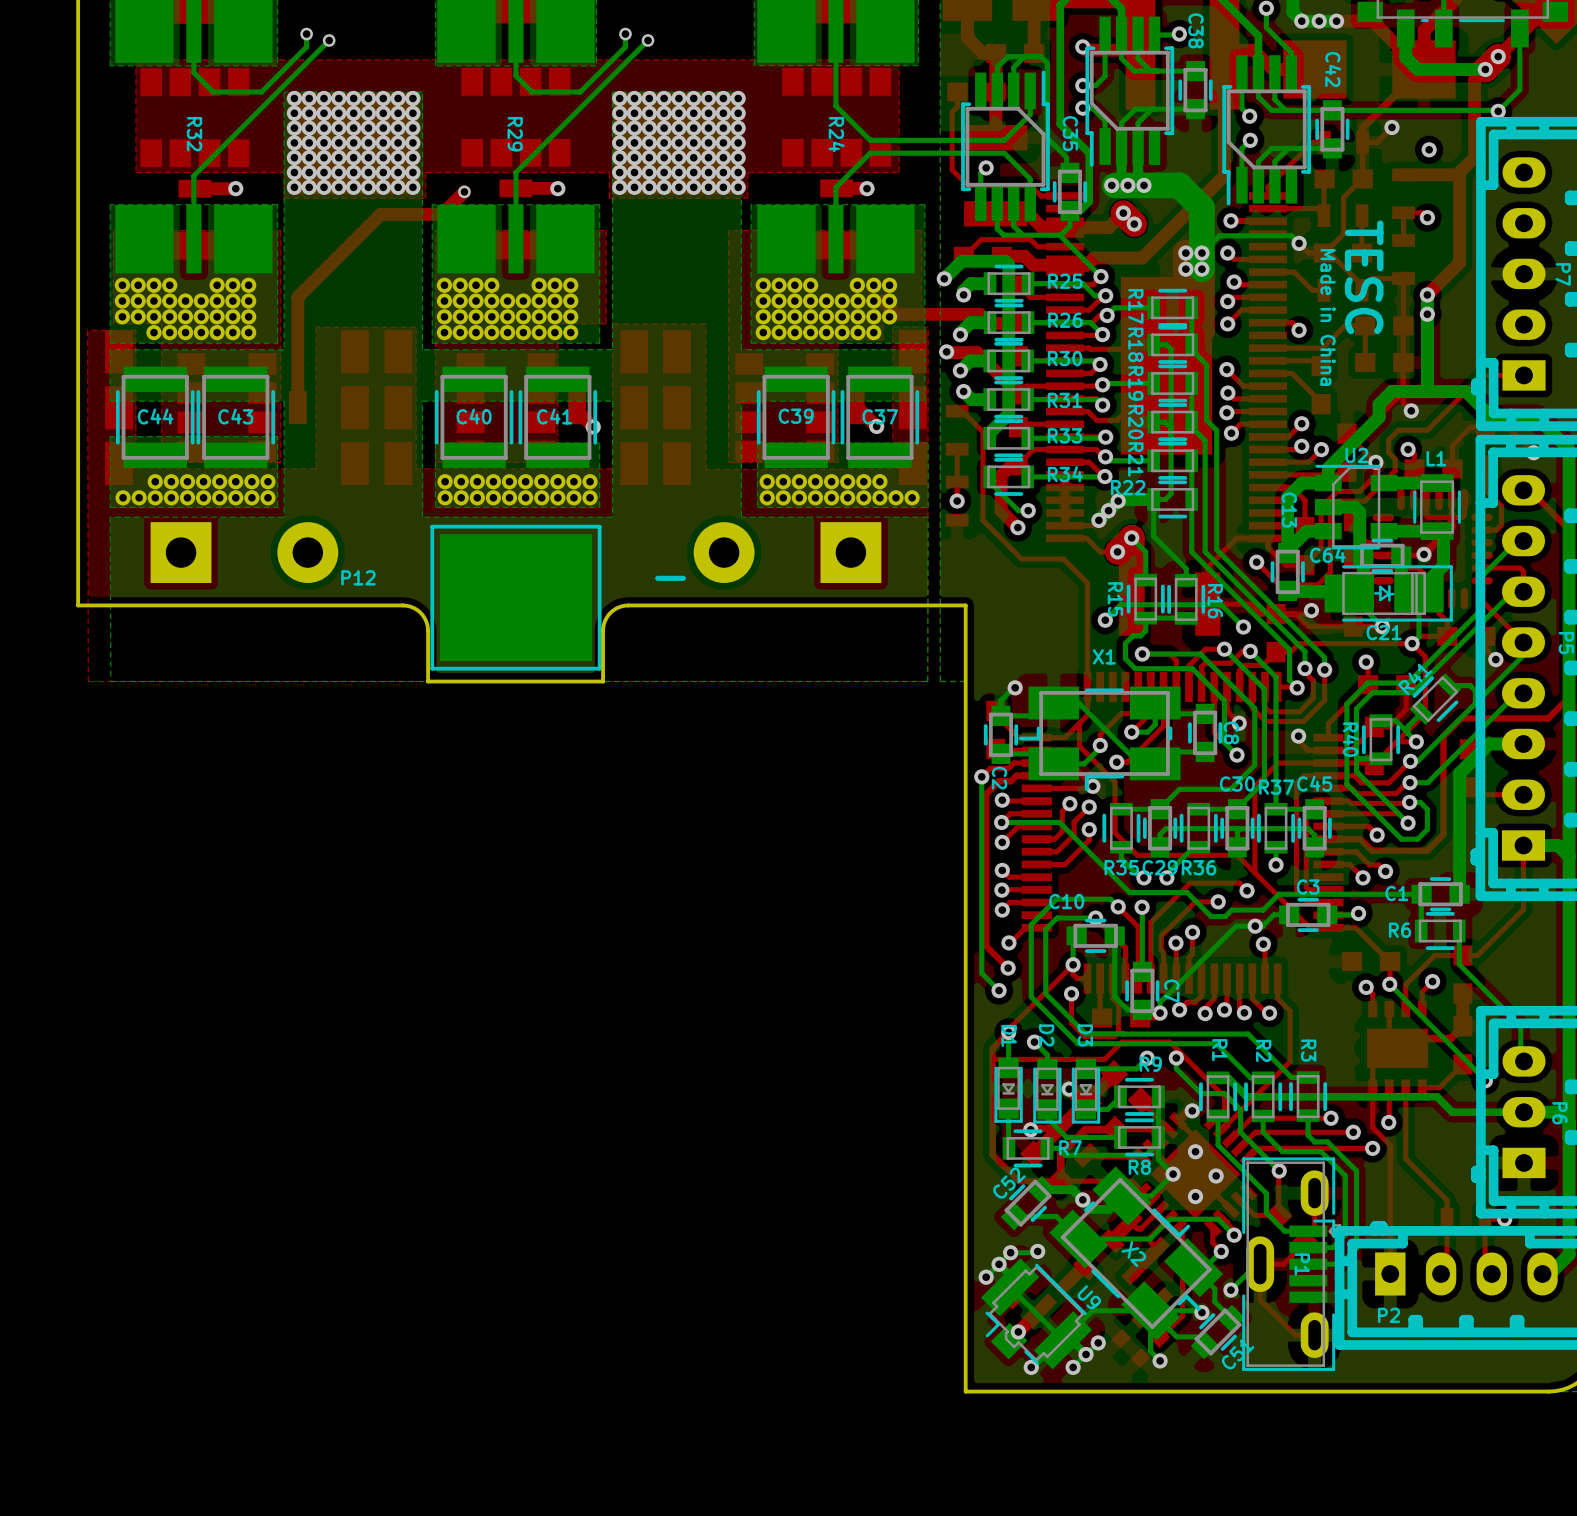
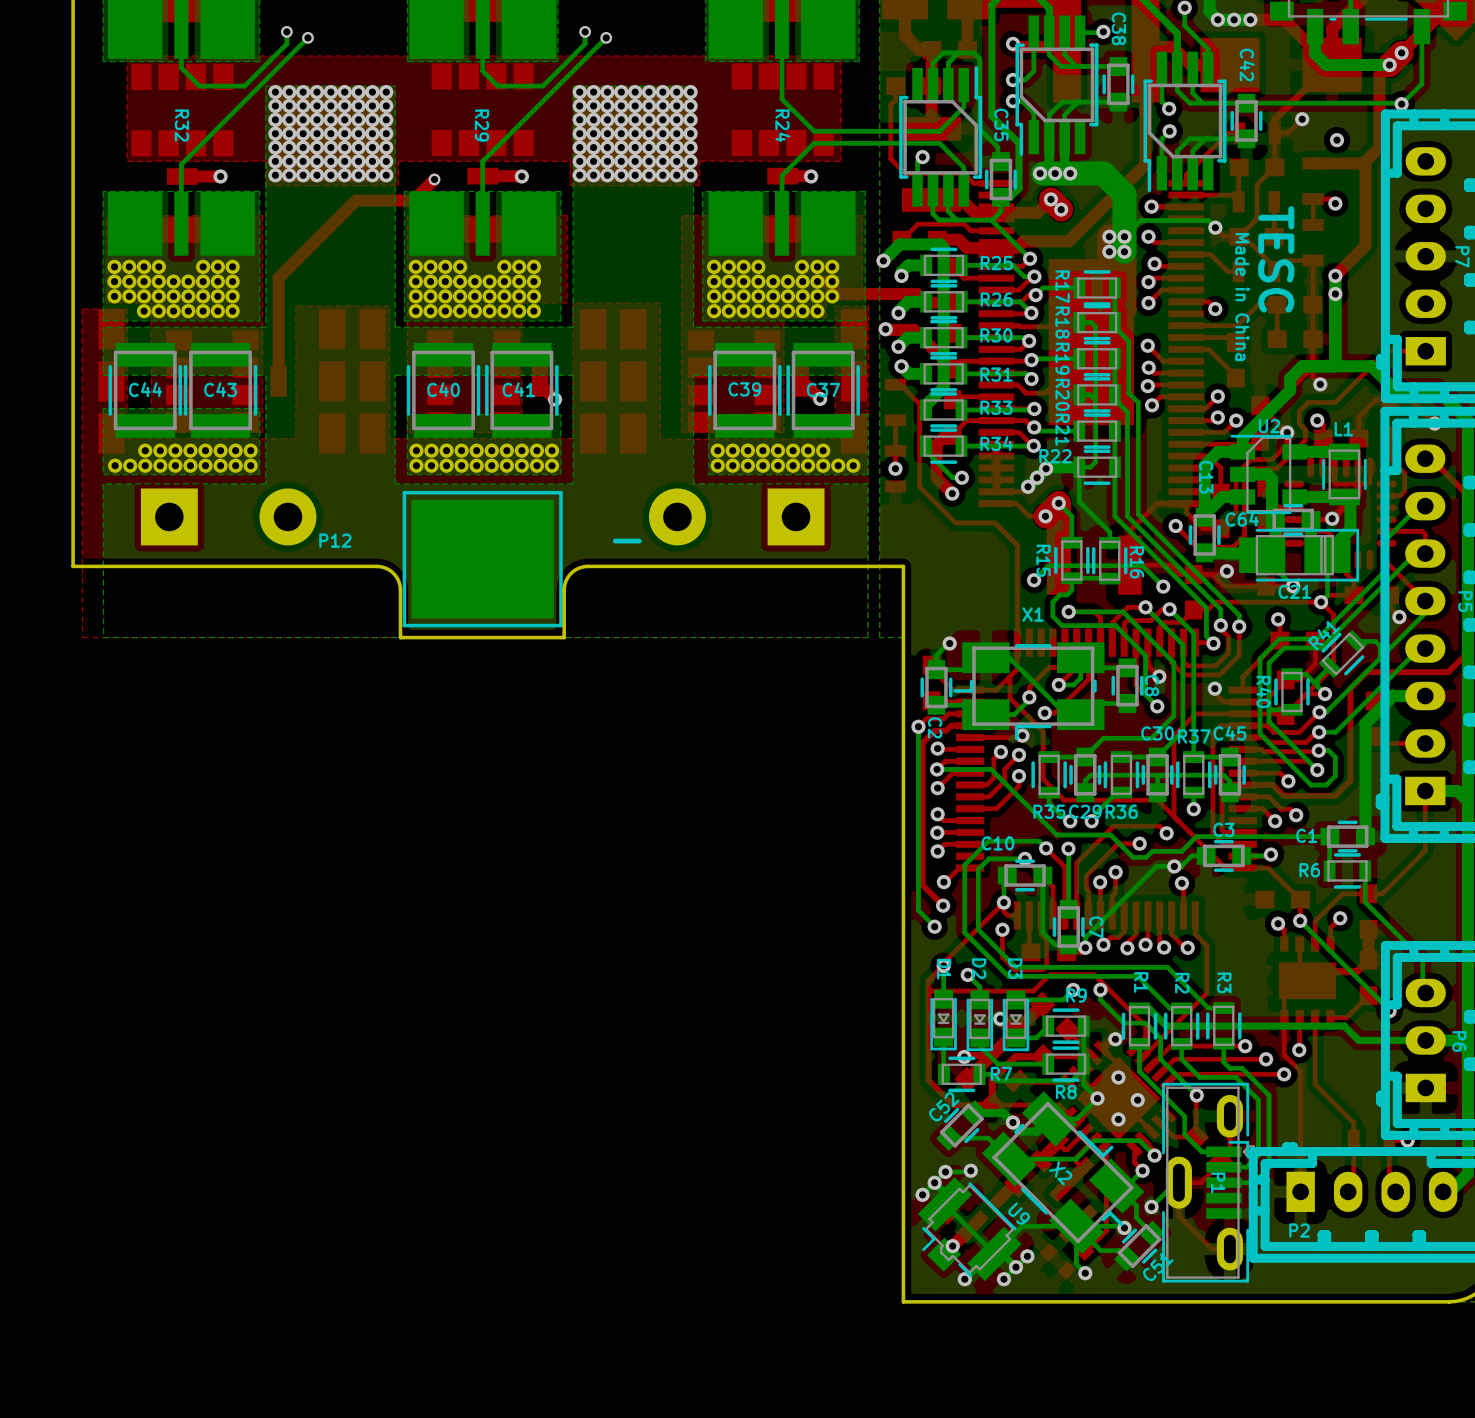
line: (1389, 586) (1389, 600) -> none
line: (1380, 593) (1375, 593) -> none
line: (1393, 594) (1388, 594) (1380, 586) (1380, 599) (1388, 594) -> none

